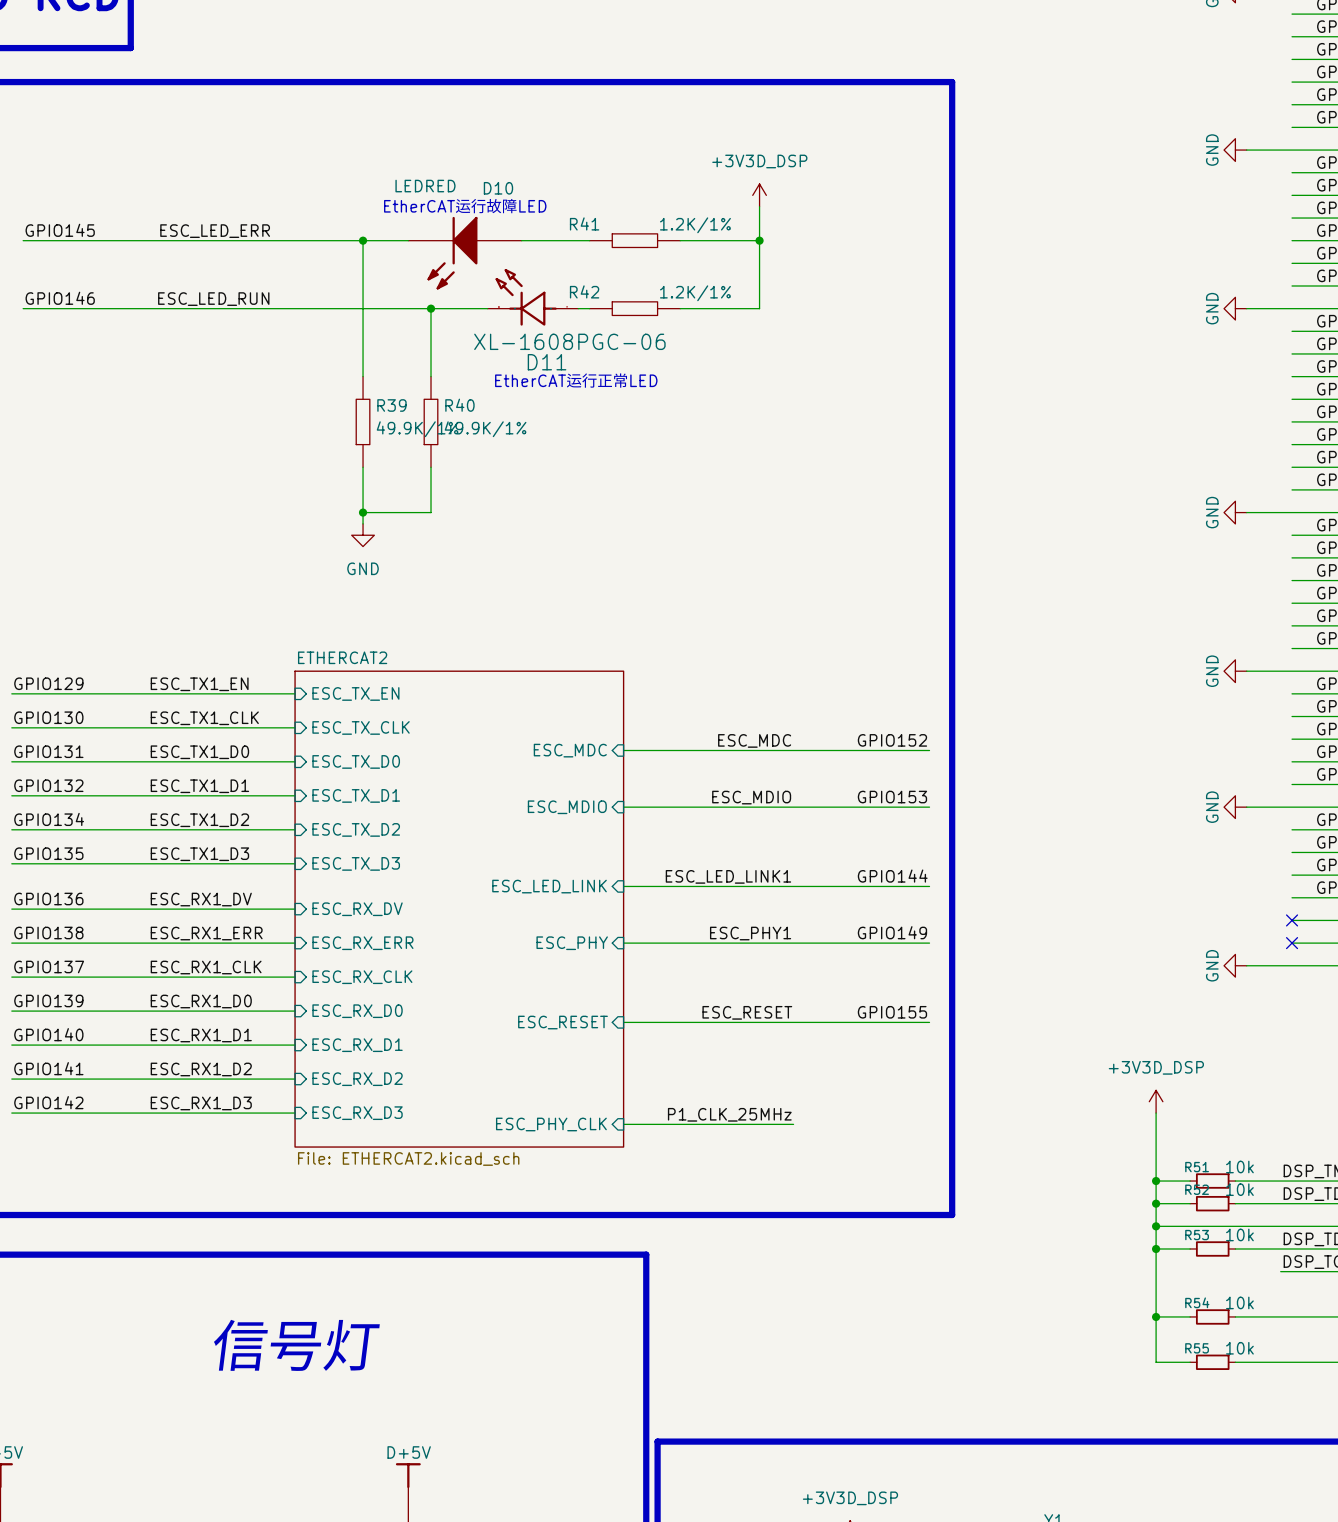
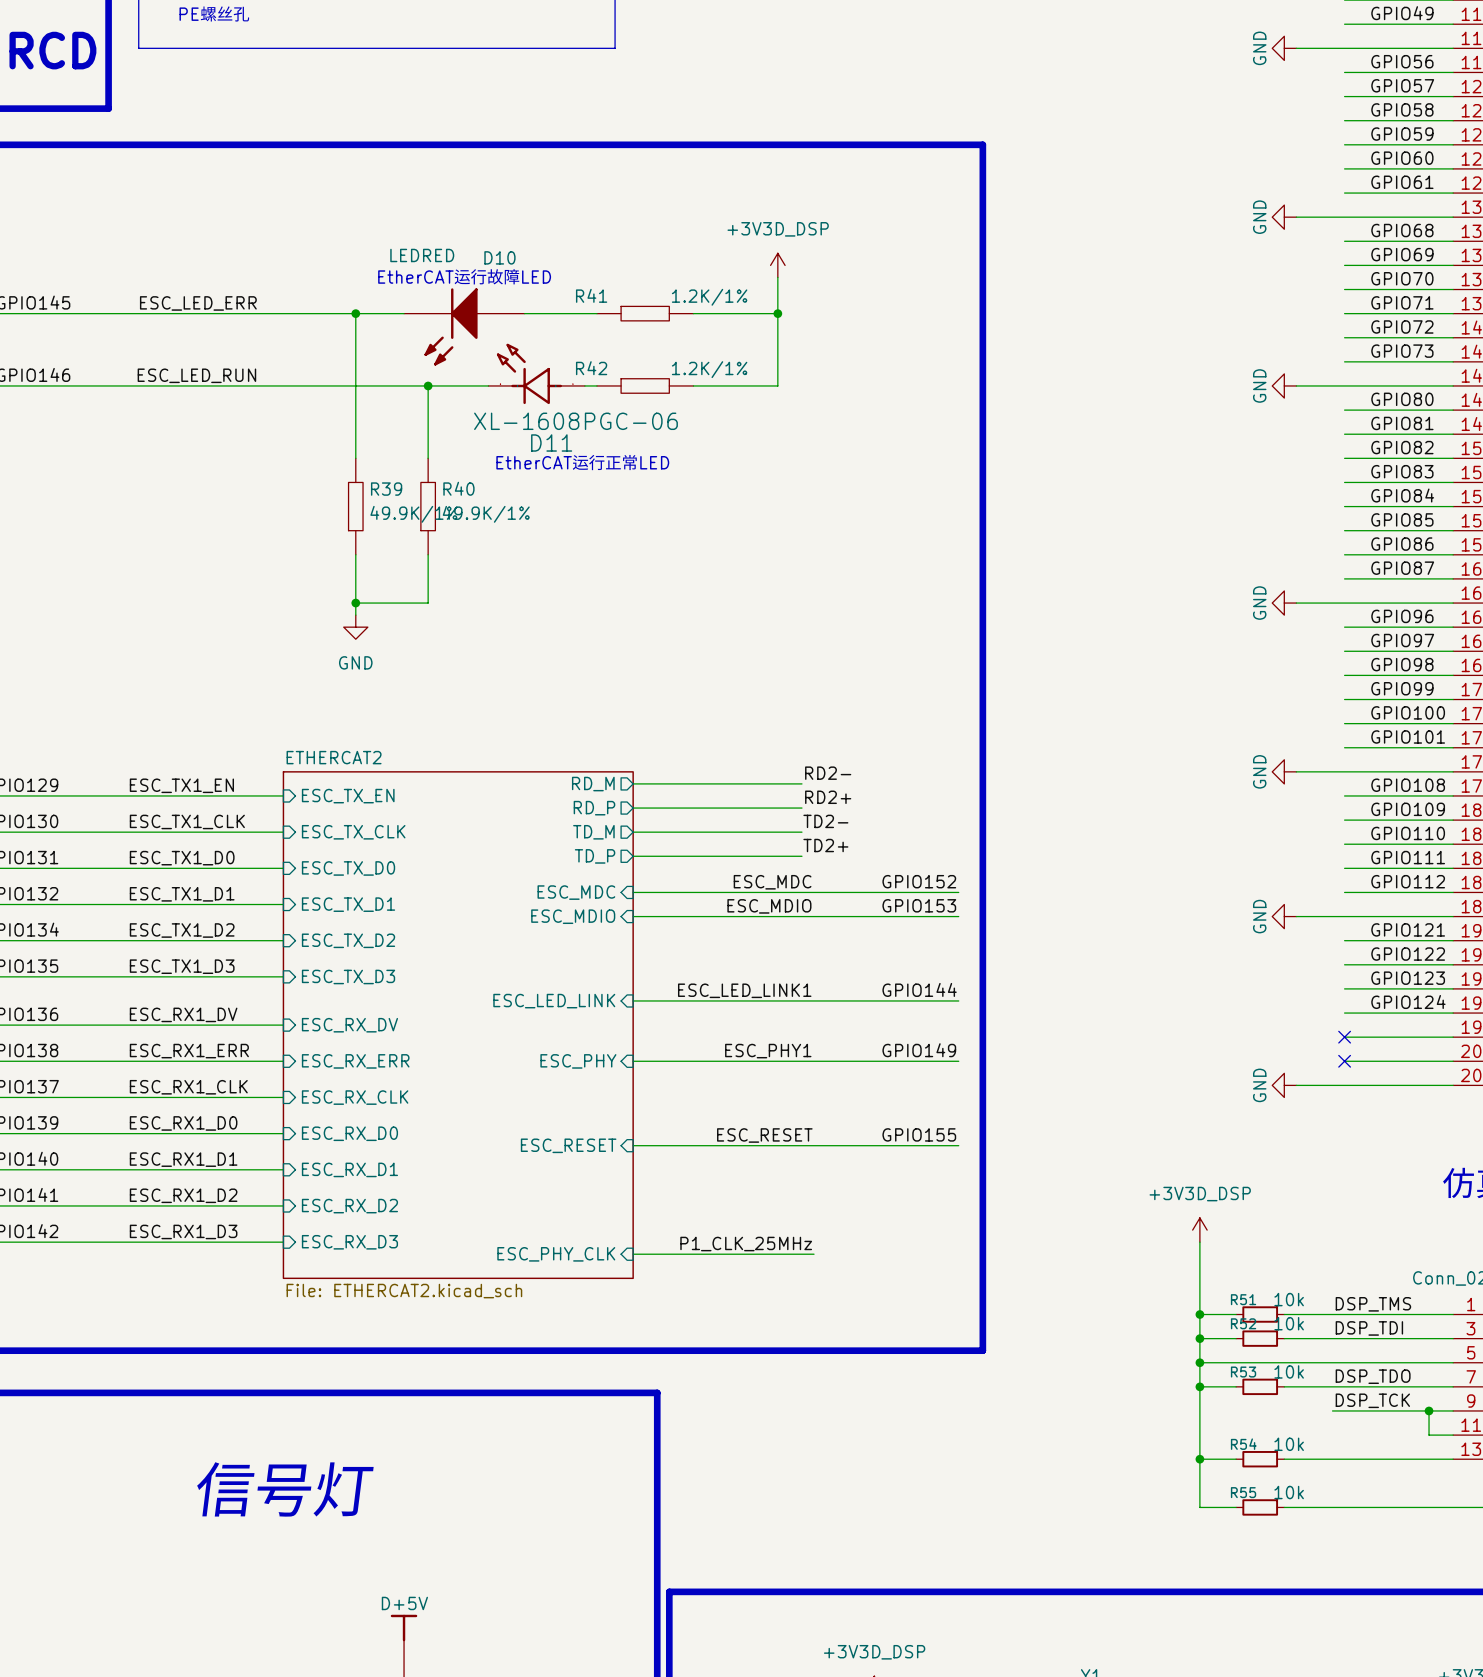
label: none -> RD2- (828, 773)
sheet pin: none -> RD_M (593, 784)
wire: none -> (633, 783) (801, 783)
label: none -> RD2+ (828, 797)
sheet pin: none -> RD_P (594, 808)
wire: none -> (633, 808) (801, 808)
label: none -> TD2- (825, 821)
sheet pin: none -> TD_M (593, 832)
wire: none -> (633, 832) (801, 832)
label position: ESC_MDC (754, 740) -> ESC_MDC (772, 882)
label: none -> TD2+ (825, 845)
label position: GPIO152 (892, 740) -> GPIO152 (919, 881)
sheet pin shape: input (570, 750) -> output (595, 856)
sheet pin: ESC_MDC (570, 750) -> TD_P (595, 856)
wire: (782, 750) (929, 750) -> none
sheet pin: none -> ESC_MDC (576, 892)
wire: none -> (633, 892) (958, 892)

